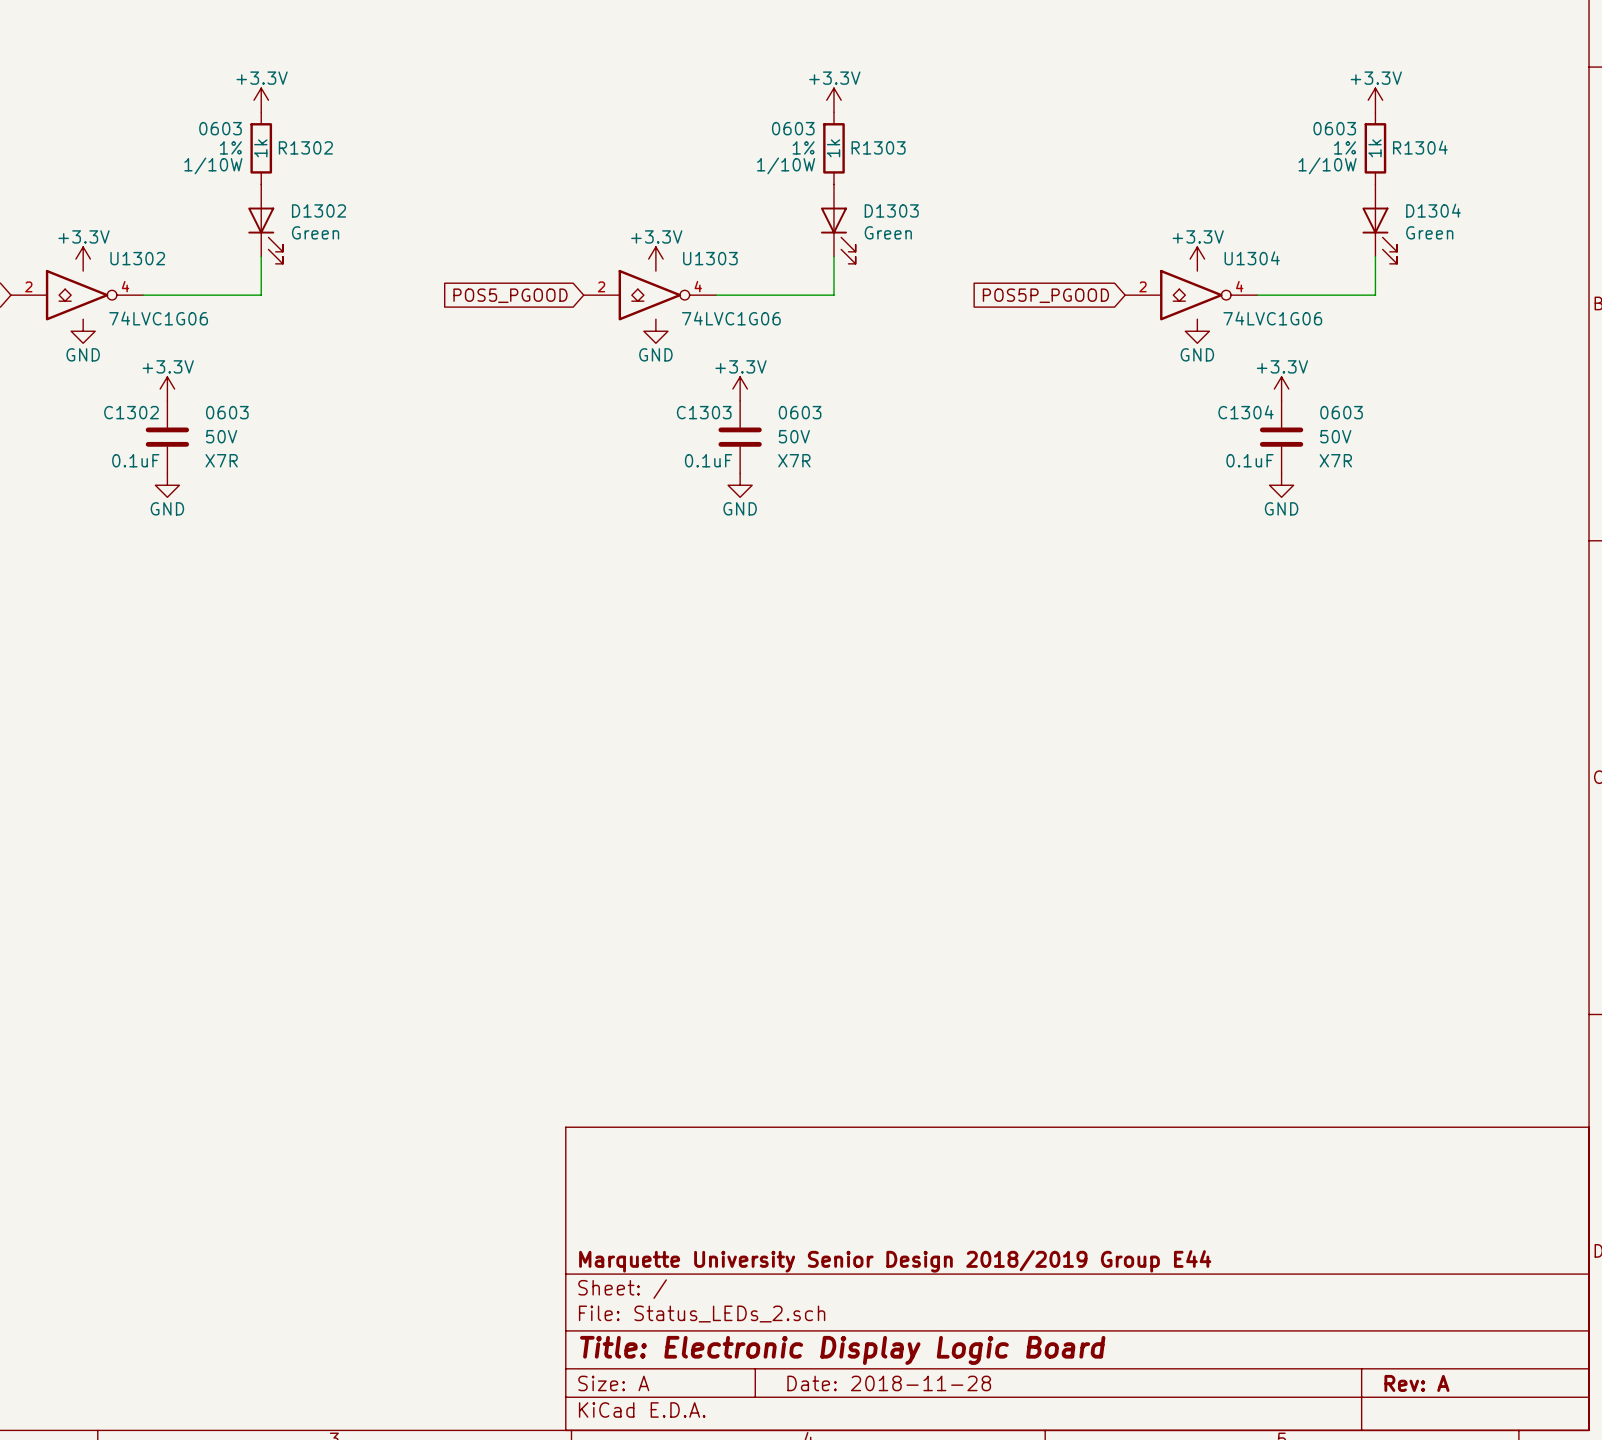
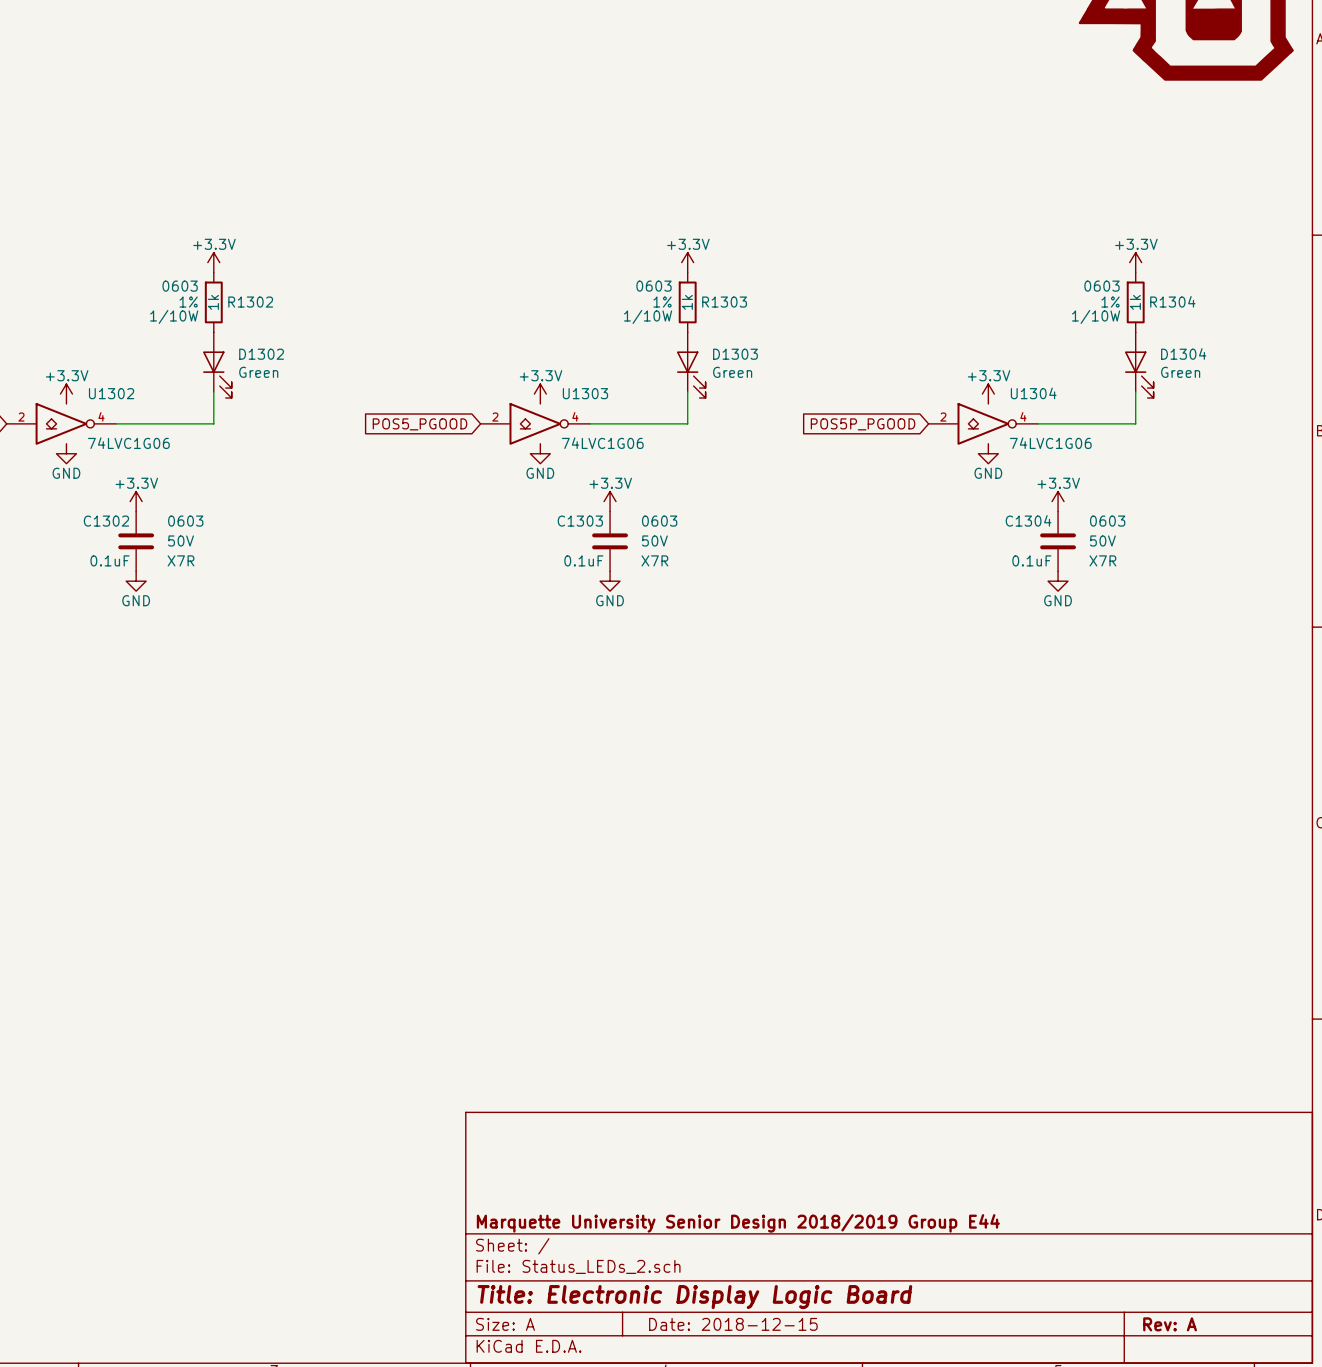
title block: Date: 2018-11-28 (889, 1383) -> Date: 2018-12-15 (733, 1324)

